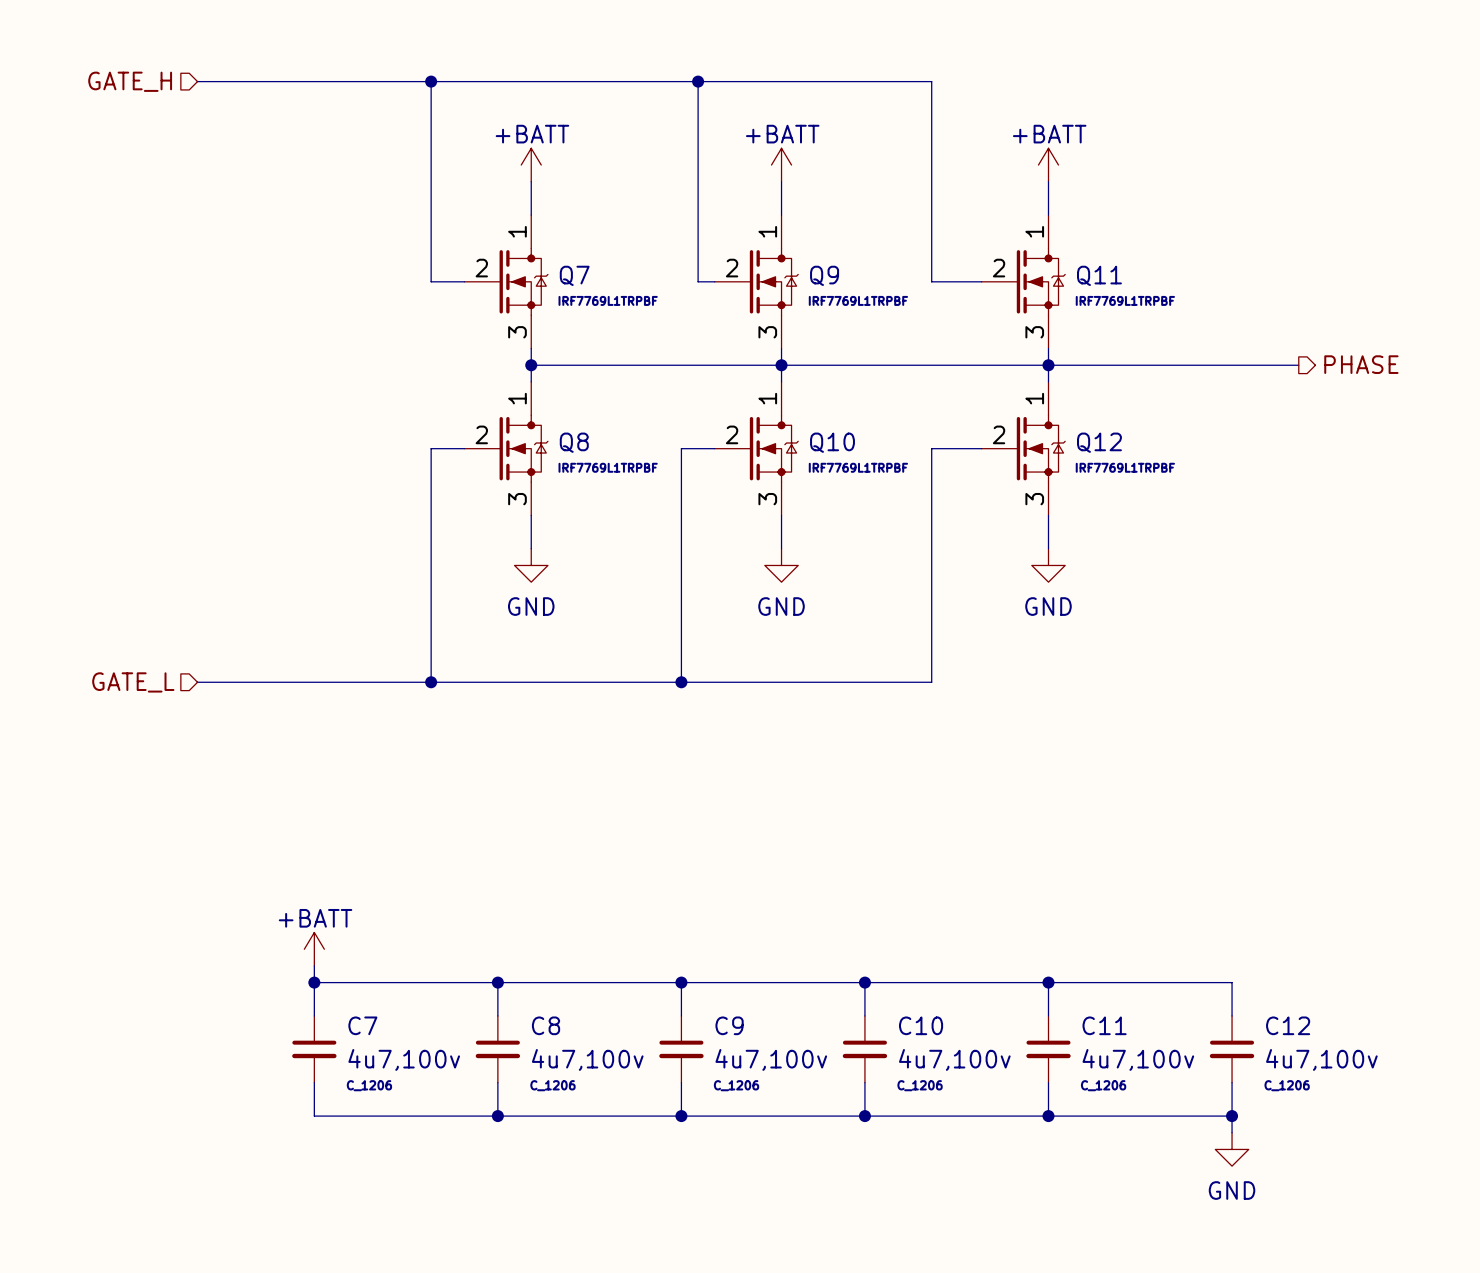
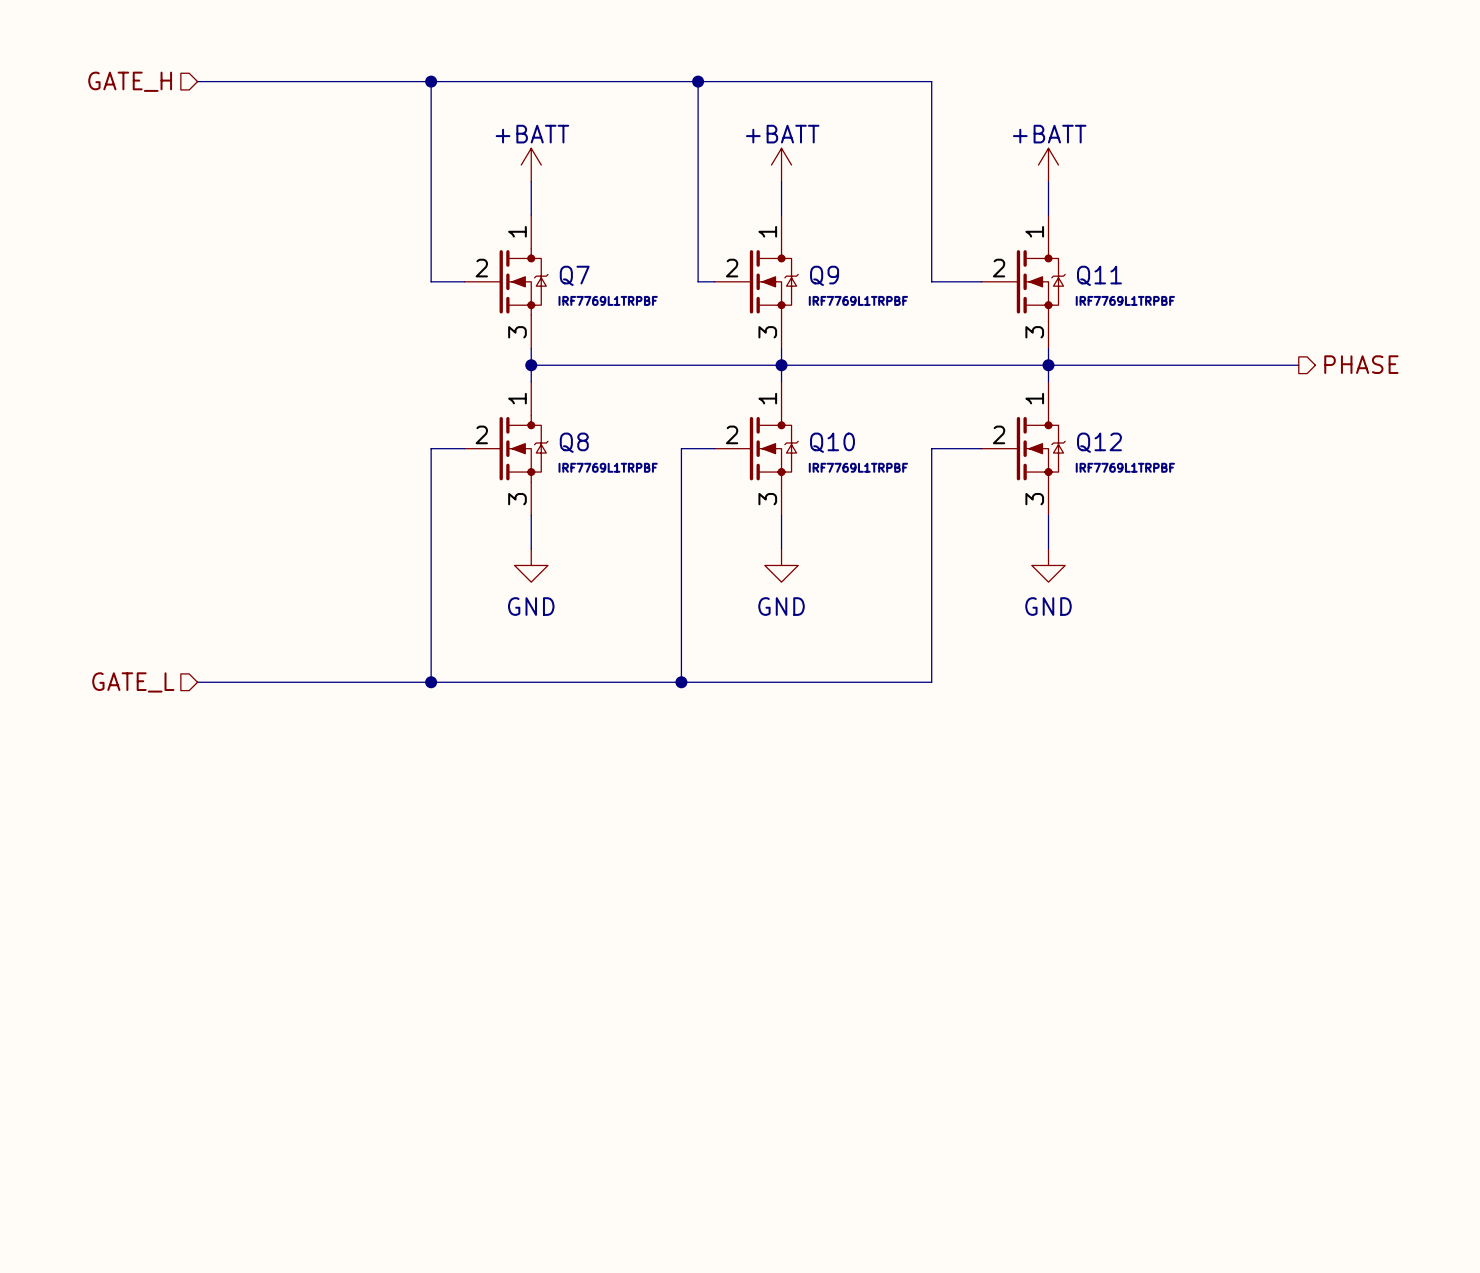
power symbol: +BATT (314, 949) -> none
wire: (314, 965) (314, 1015) -> none
wire: (314, 982) (1232, 982) (1232, 1015) -> none
junction: (314, 982) -> none
wire: (497, 982) (497, 1015) -> none
junction: (497, 982) -> none
wire: (681, 982) (681, 1015) -> none
junction: (681, 982) -> none
wire: (864, 982) (864, 1015) -> none
junction: (864, 982) -> none
wire: (1048, 982) (1048, 1015) -> none
junction: (1048, 982) -> none
C7: 4u7,100v (314, 1049) -> none
C8: 4u7,100v (497, 1049) -> none
C9: 4u7,100v (681, 1049) -> none
C10: 4u7,100v (864, 1049) -> none
C11: 4u7,100v (1048, 1049) -> none
C12: 4u7,100v (1232, 1049) -> none
wire: (314, 1082) (314, 1116) (1232, 1116) -> none
wire: (497, 1082) (497, 1116) -> none
wire: (681, 1082) (681, 1116) -> none
wire: (864, 1082) (864, 1116) -> none
wire: (1048, 1082) (1048, 1116) -> none
wire: (1232, 1082) (1232, 1132) -> none
junction: (497, 1116) -> none
junction: (681, 1116) -> none
junction: (864, 1116) -> none
junction: (1048, 1116) -> none
junction: (1232, 1116) -> none
power symbol: GND (1232, 1149) -> none

